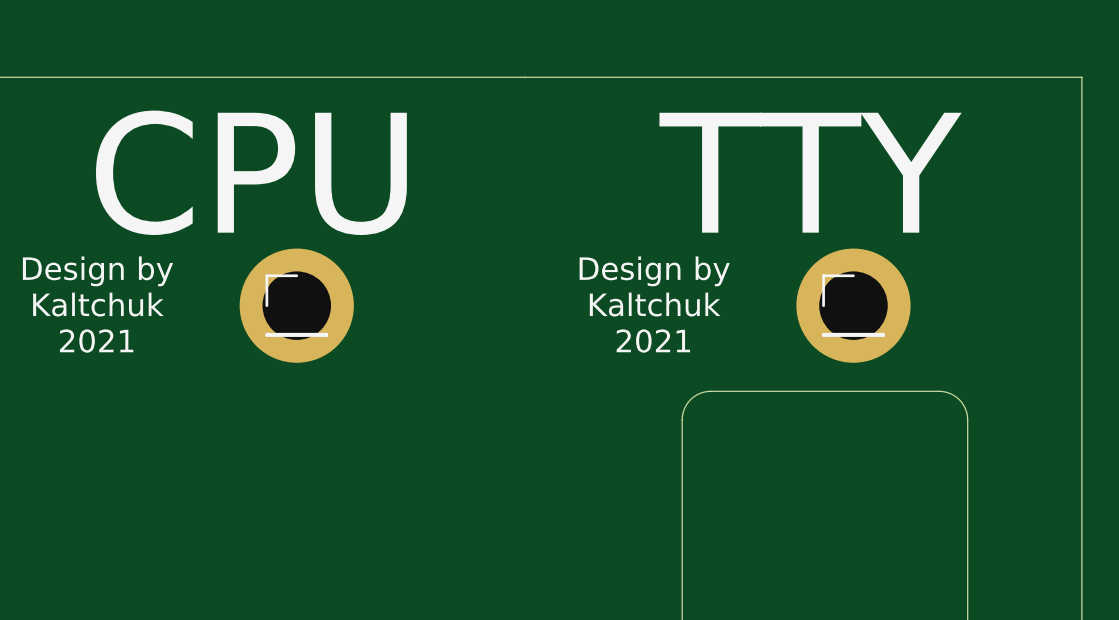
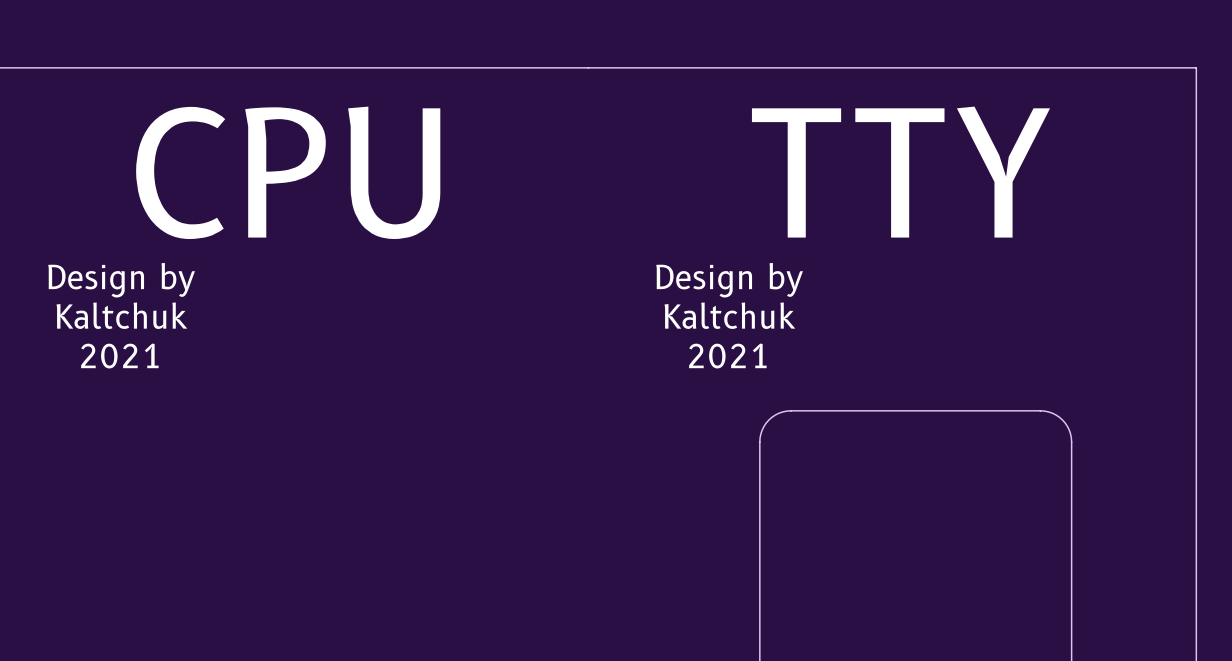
part: (296, 305) -> none
part: (853, 305) -> none

